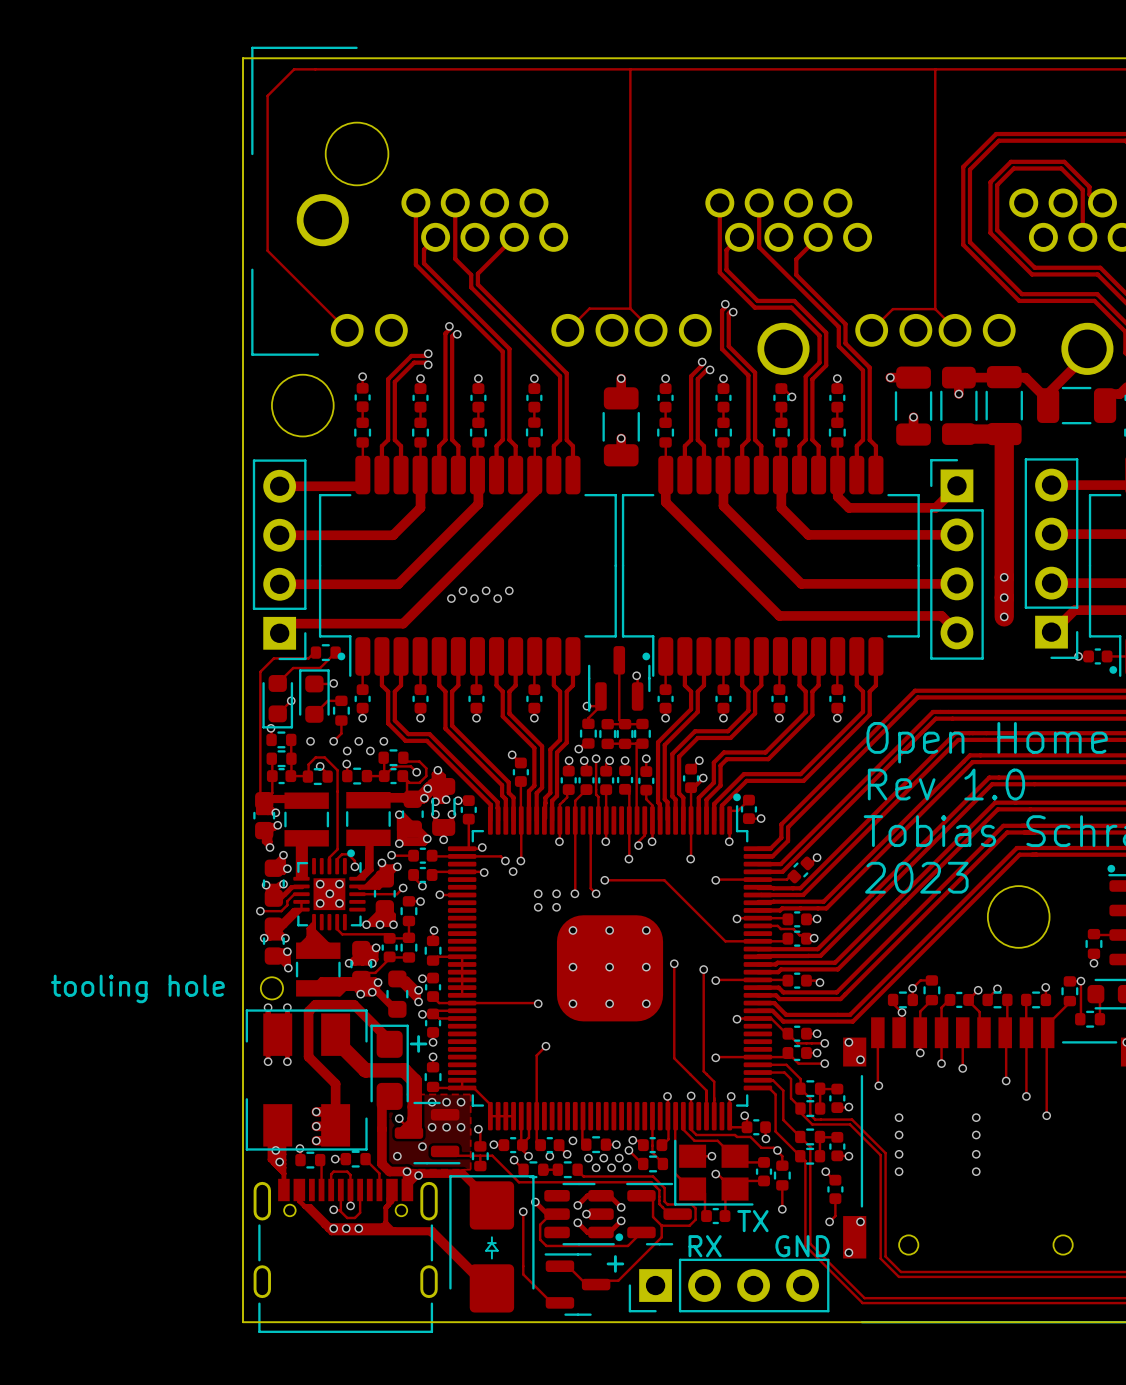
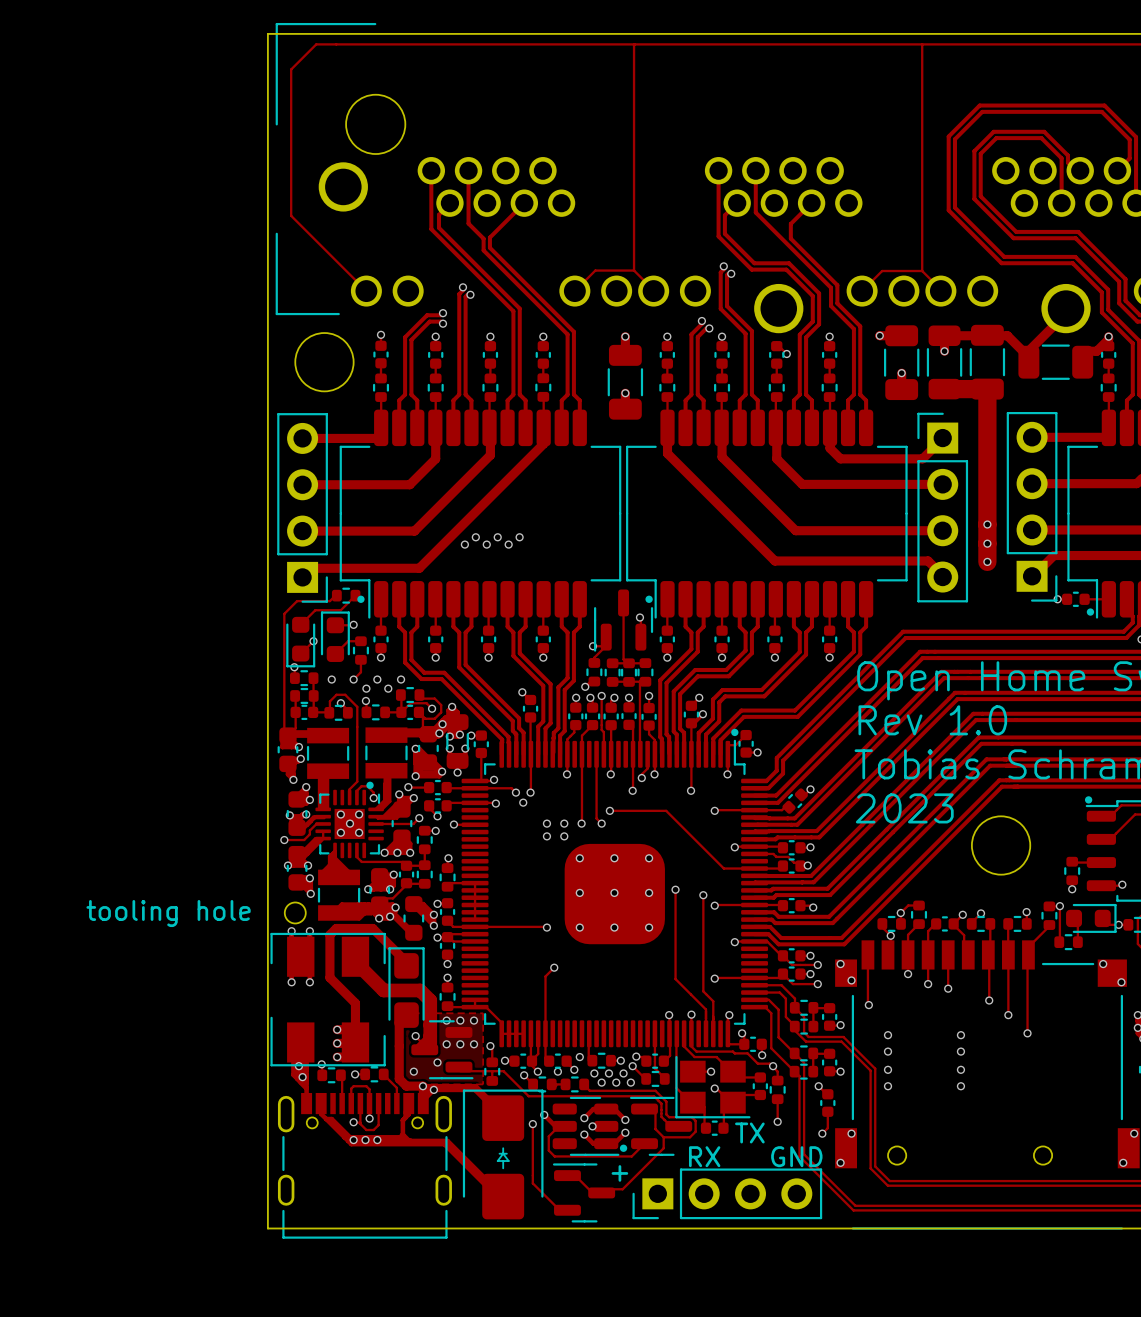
text: + (418, 1043) -> none

